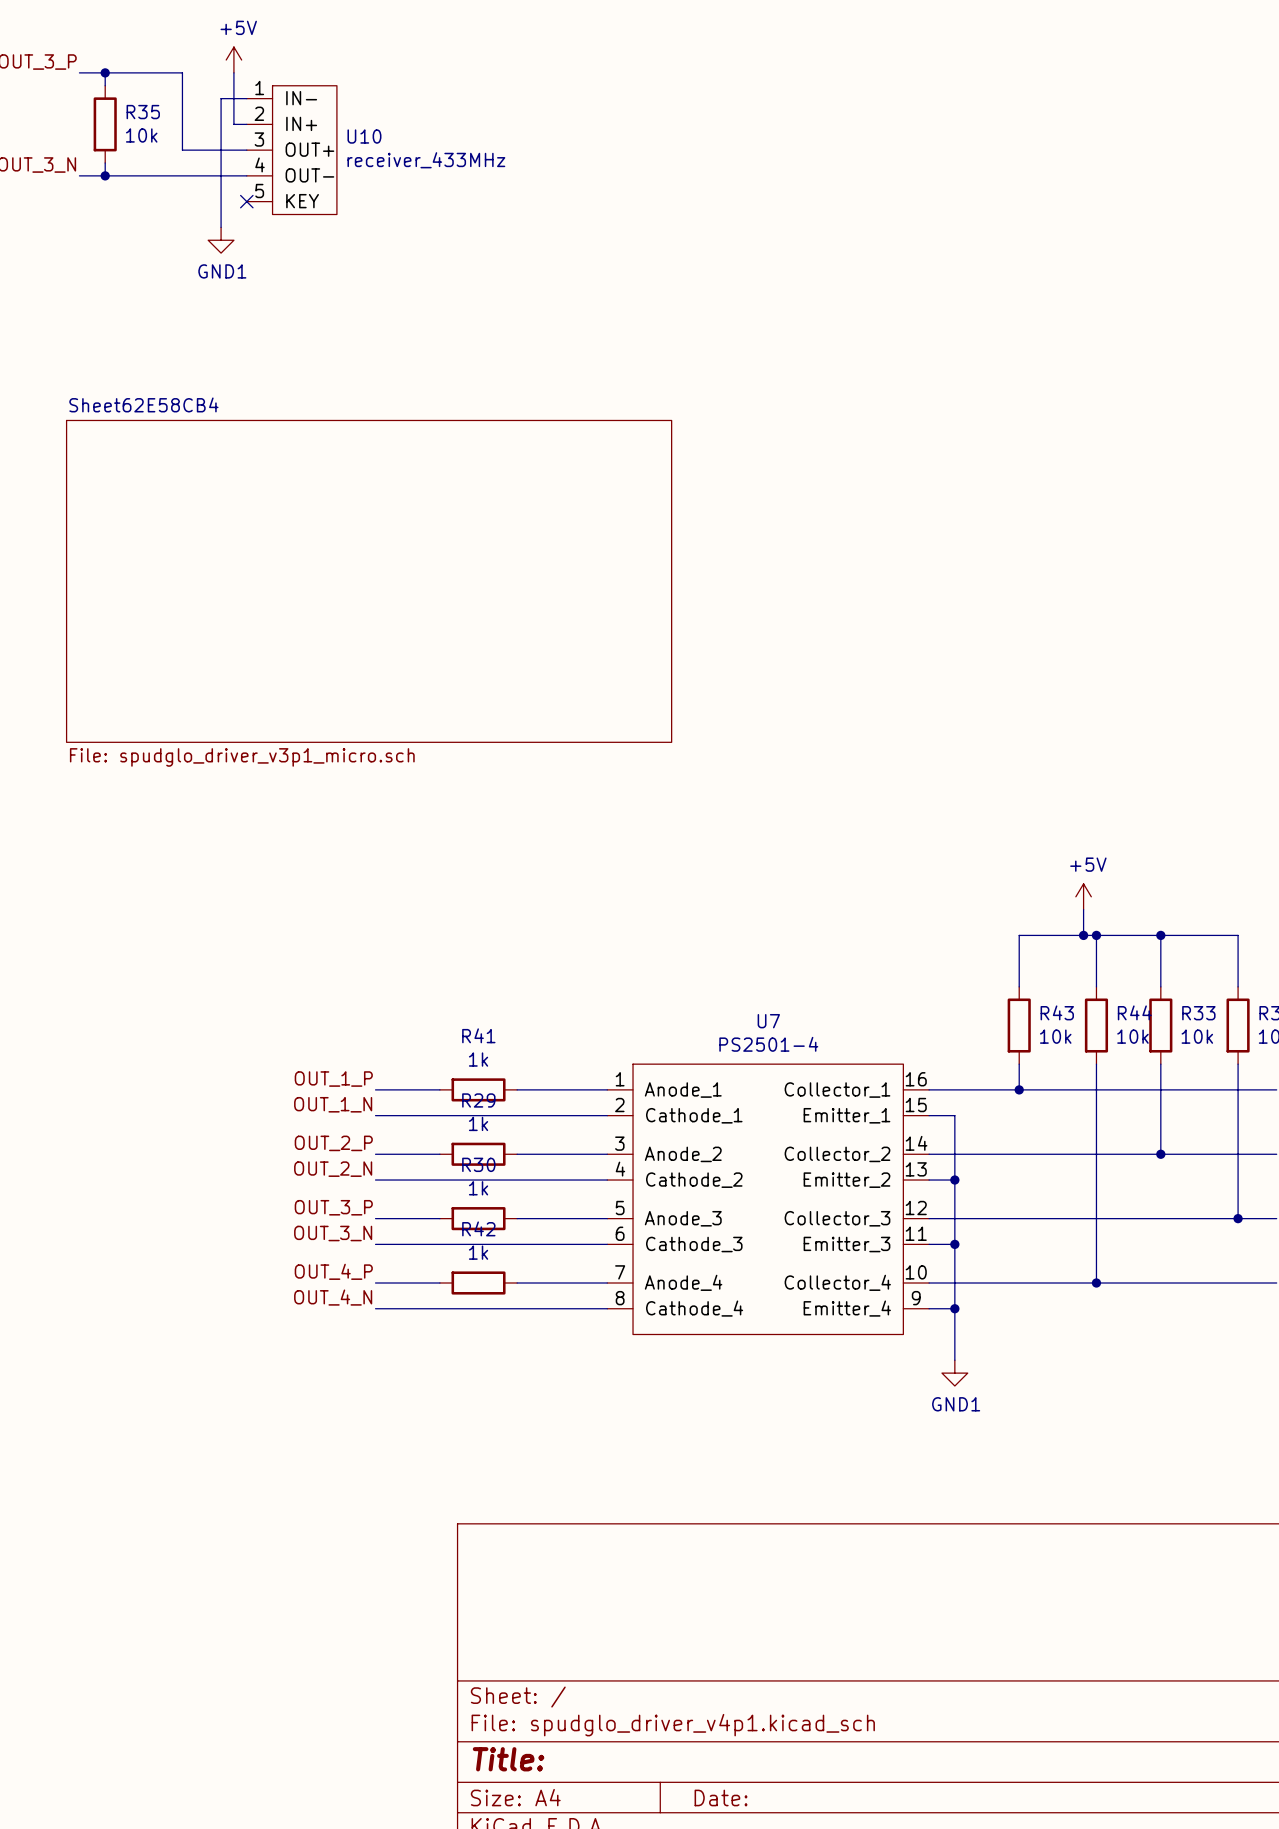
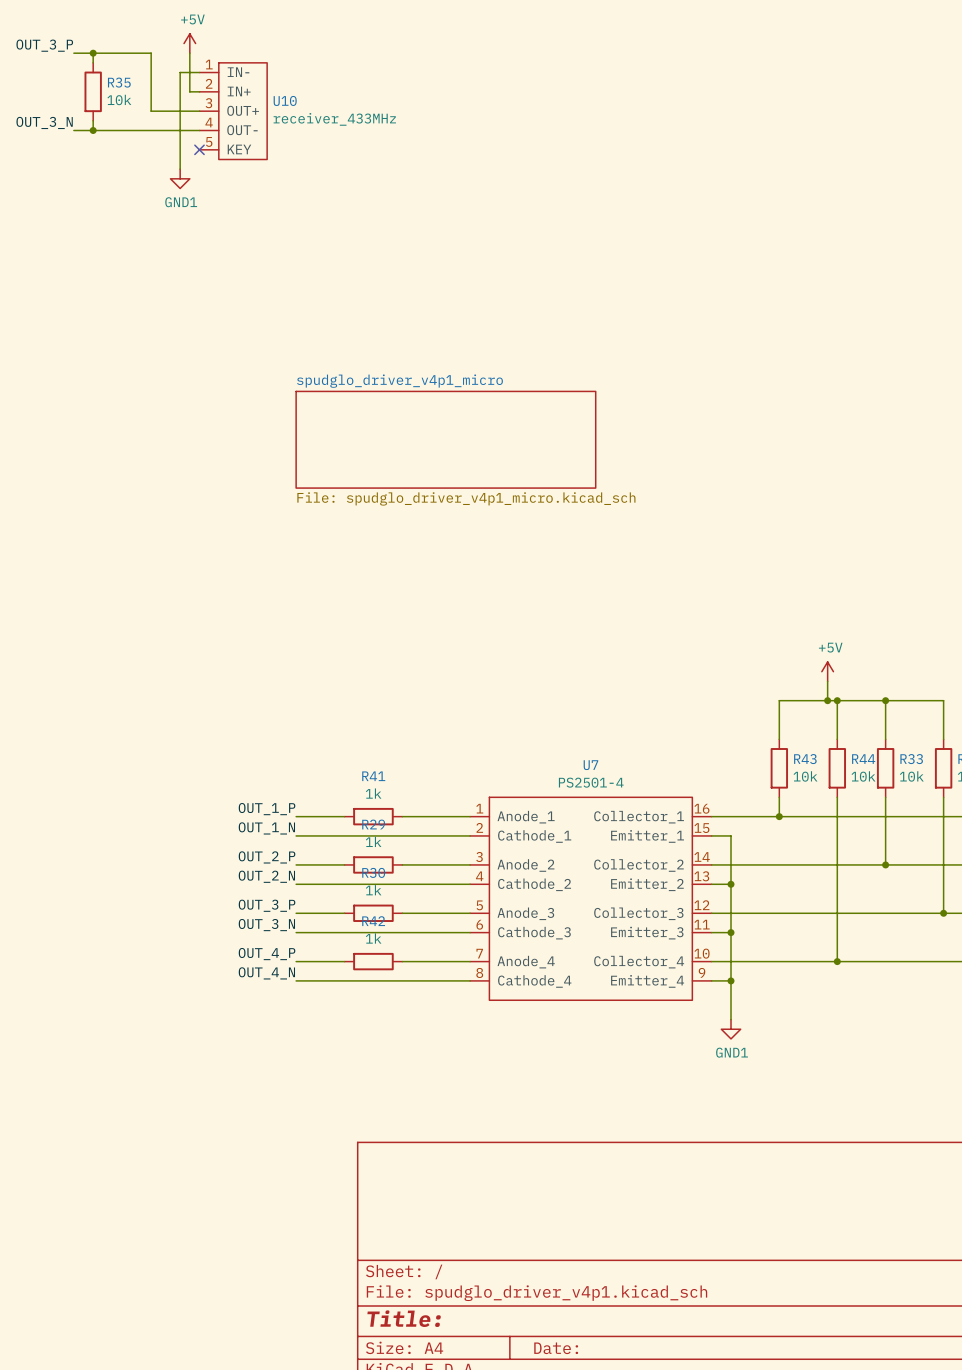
sheet Sheet62E58CB4: File: spudglo_driver_v3p1_micro.sch (369, 581) -> none
sheet spudglo_driver_v4p1_micro: none -> File: spudglo_driver_v4p1_micro.kicad_sch (445, 439)

